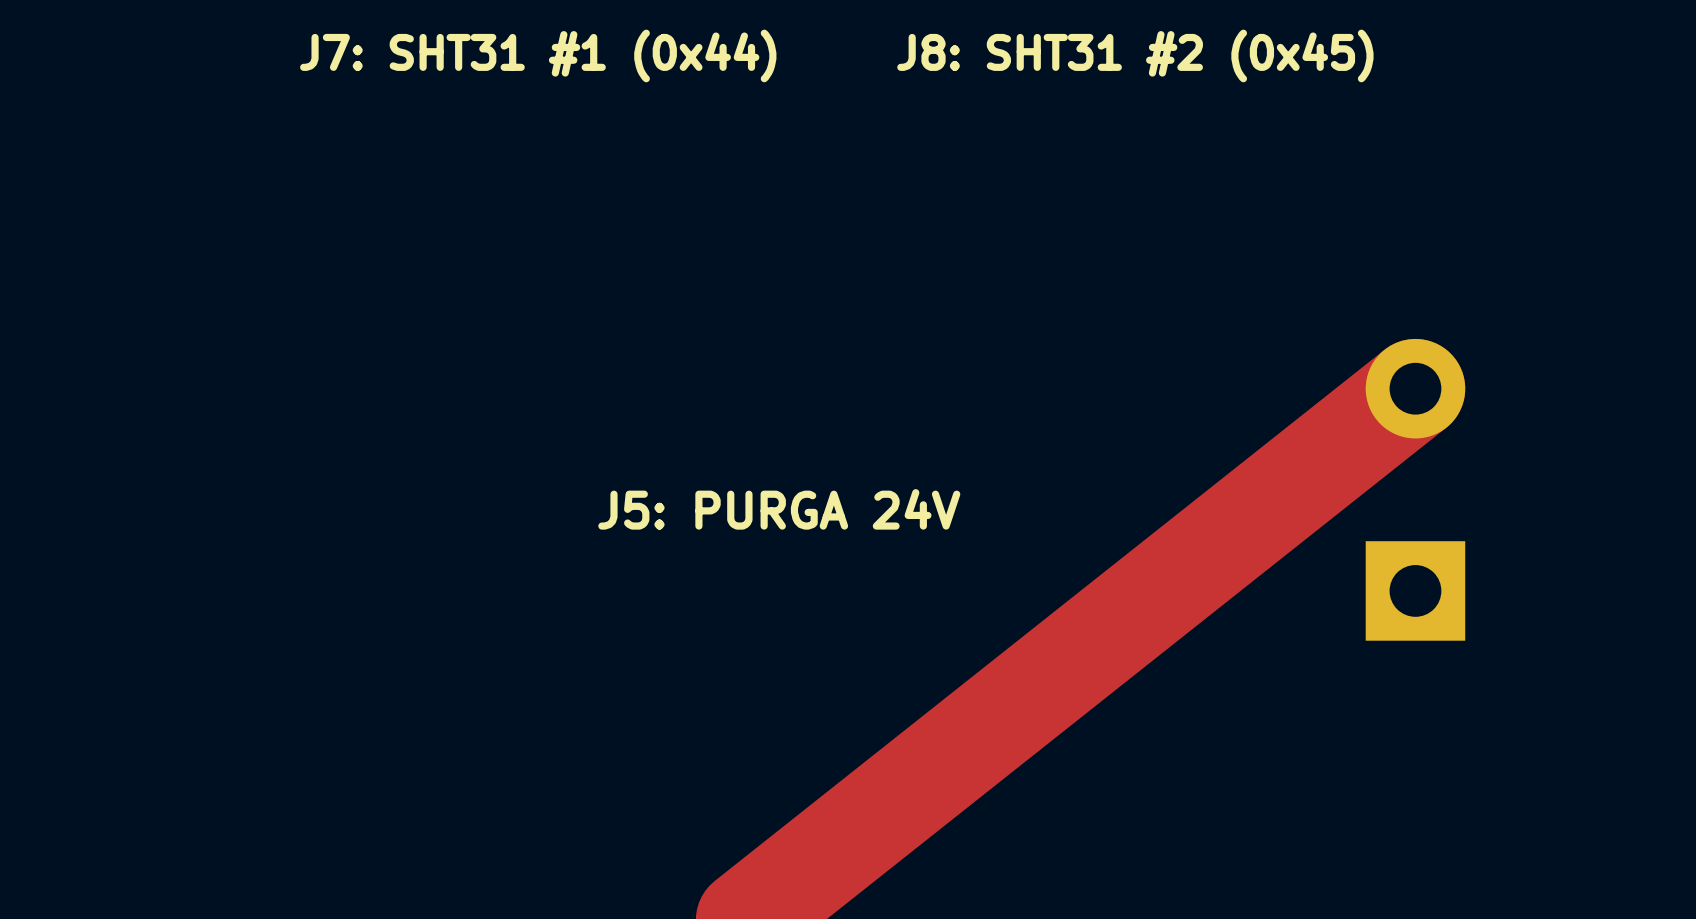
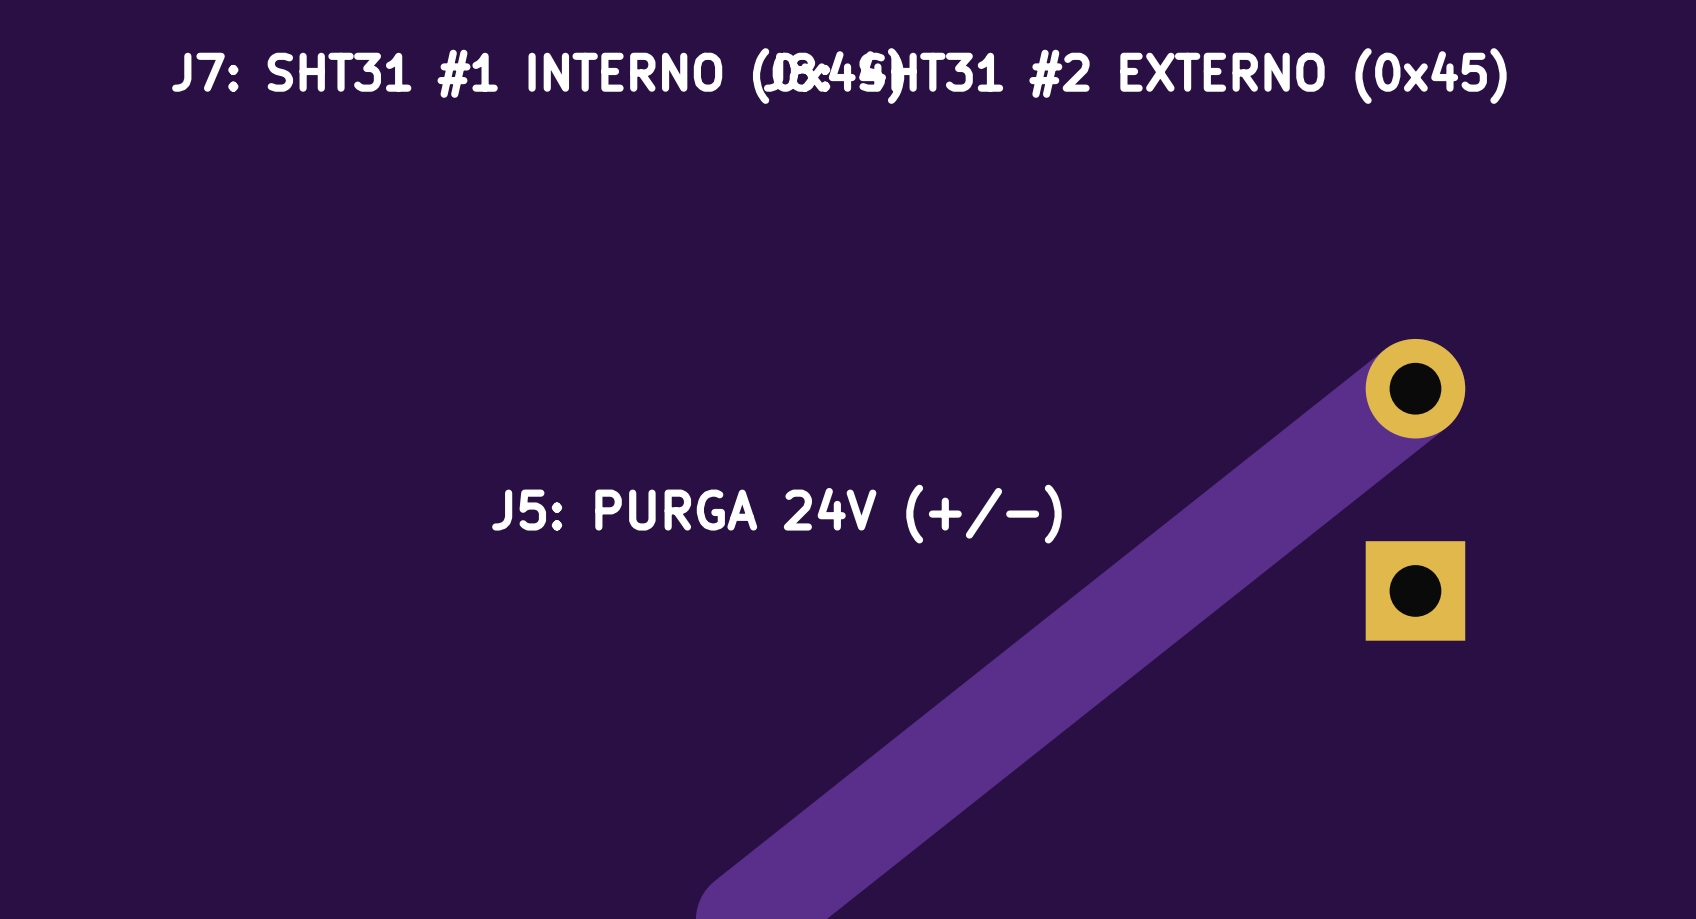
text: J7: SHT31 #1 (0x44) (538, 55) -> J7: SHT31 #1 INTERNO (0x44) (538, 76)
text: J8: SHT31 #2 (0x45) (1135, 55) -> J8: SHT31 #2 EXTERNO (0x45) (1135, 76)
text: J5: PURGA 24V (779, 509) -> J5: PURGA 24V (+/-) (776, 514)

